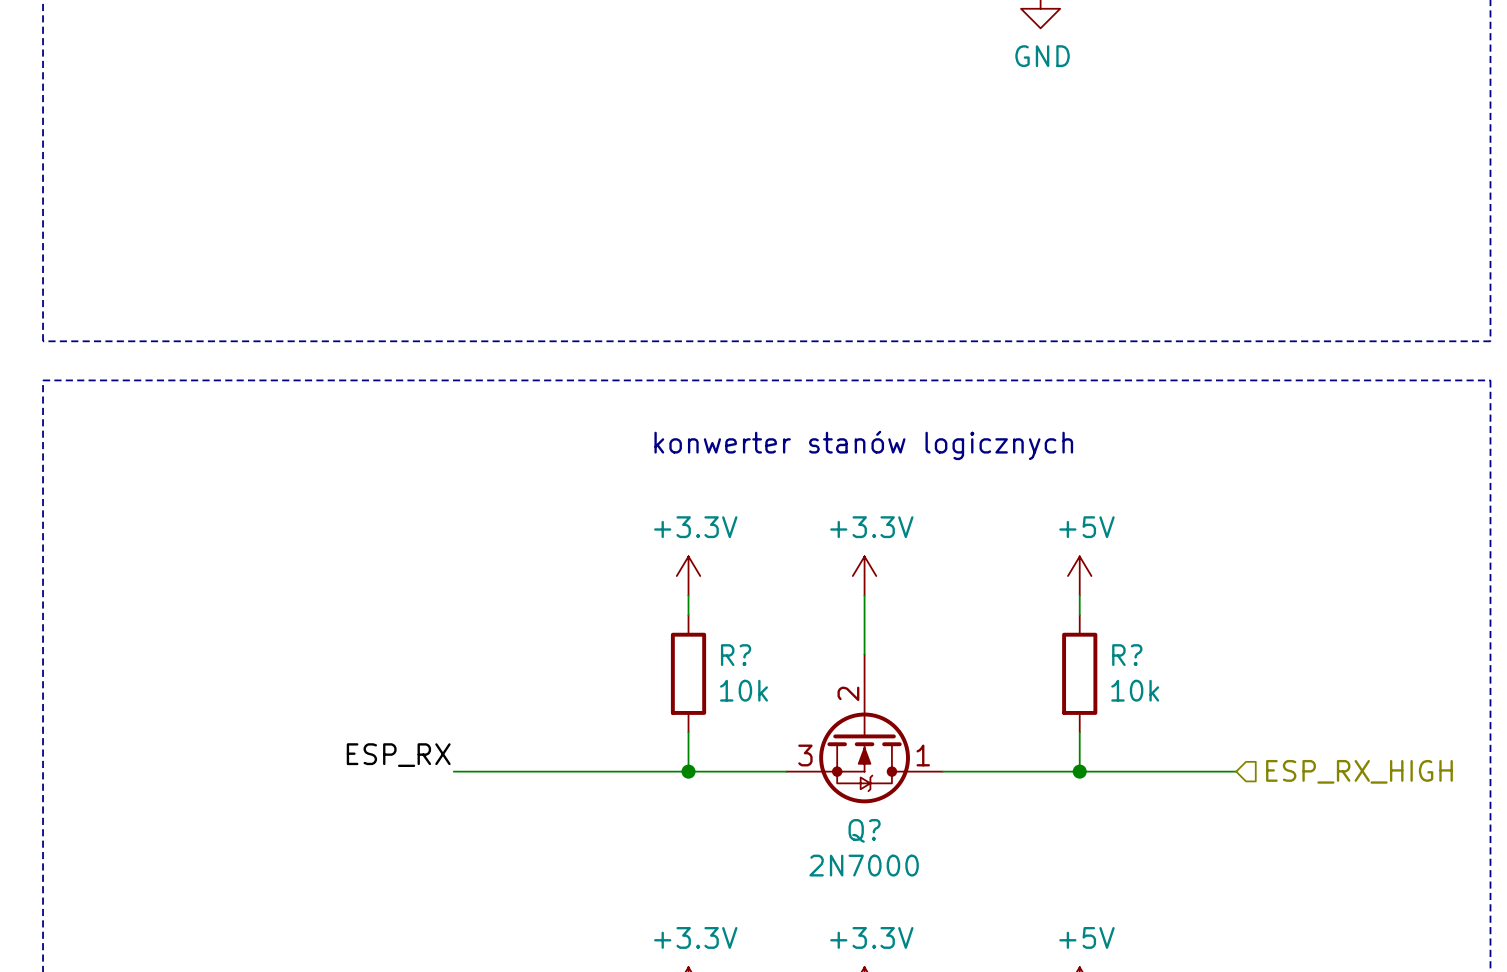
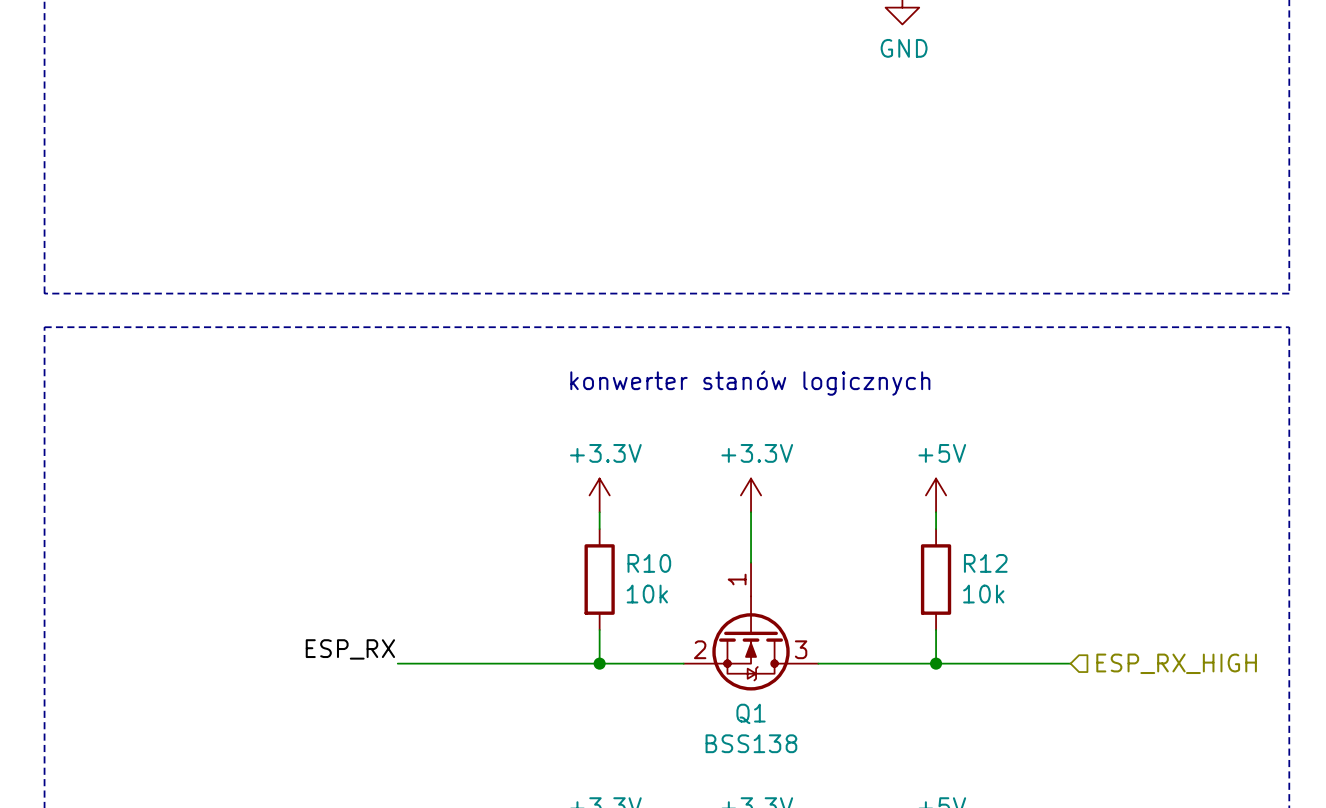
R? name: R? (736, 655) -> R10 (649, 563)
R? name: R? (1127, 655) -> R12 (985, 563)
Q?: 2N7000 (864, 728) -> none
Q1: none -> BSS138 (751, 626)

